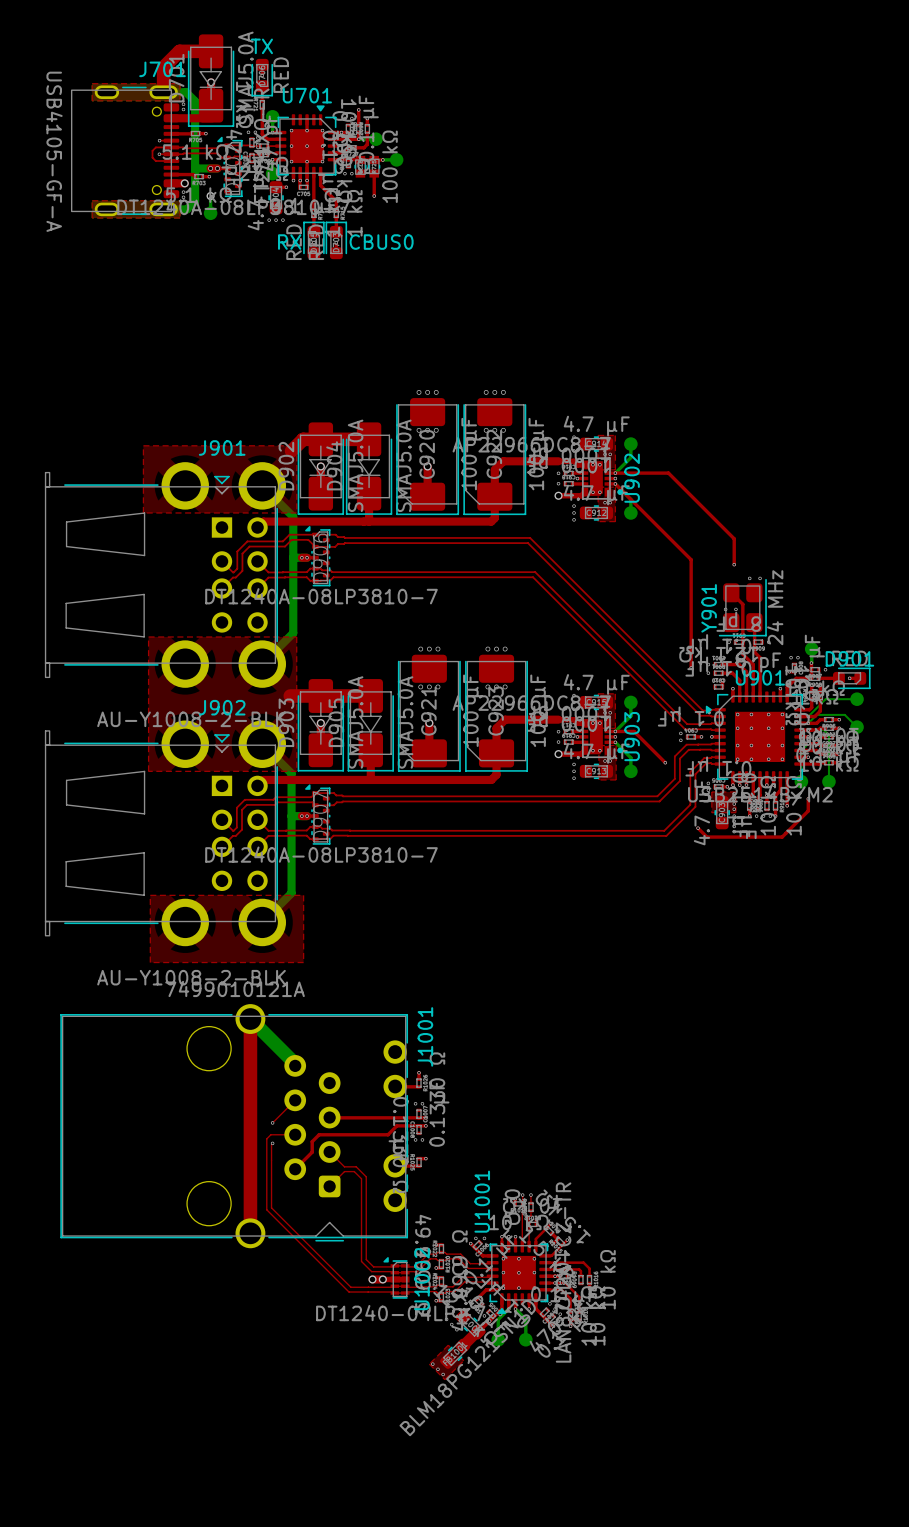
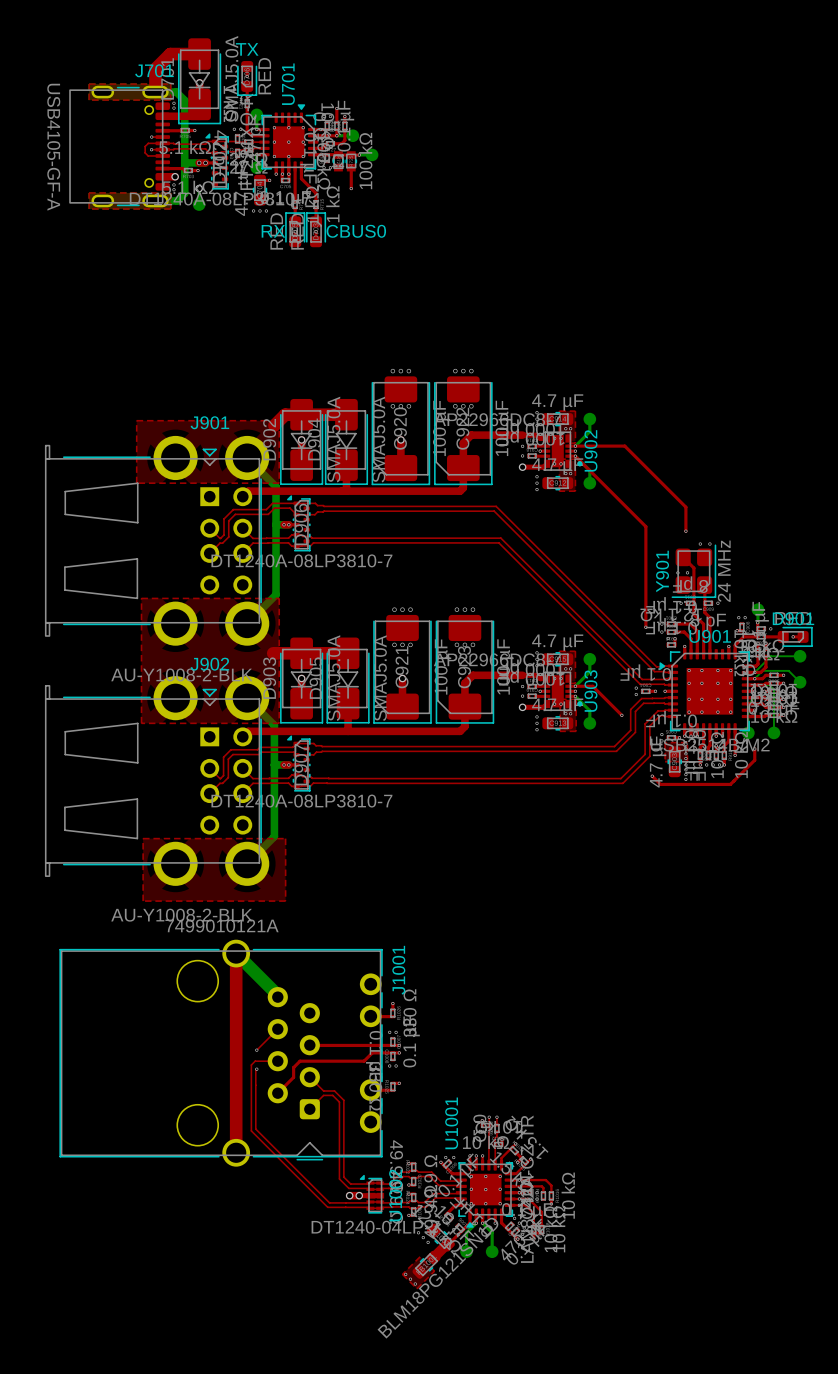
U701 name rotation: 0° (307, 95) -> 90° counterclockwise (288, 84)

